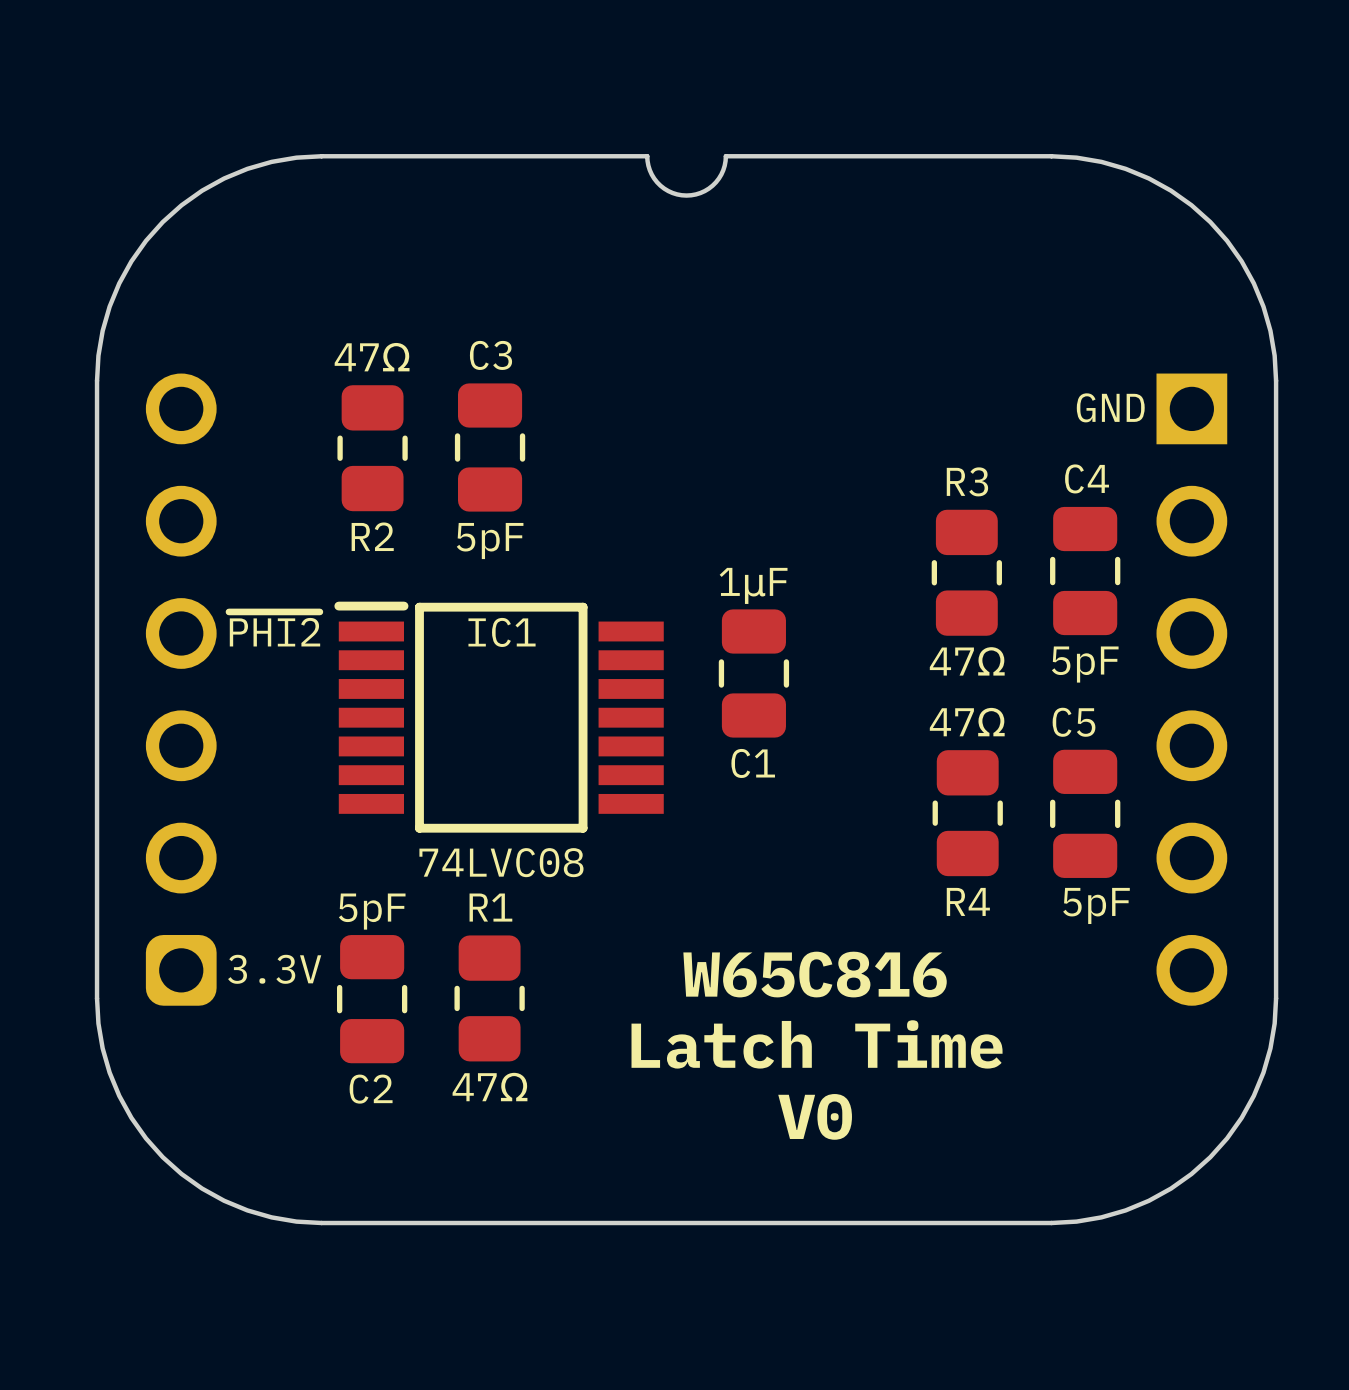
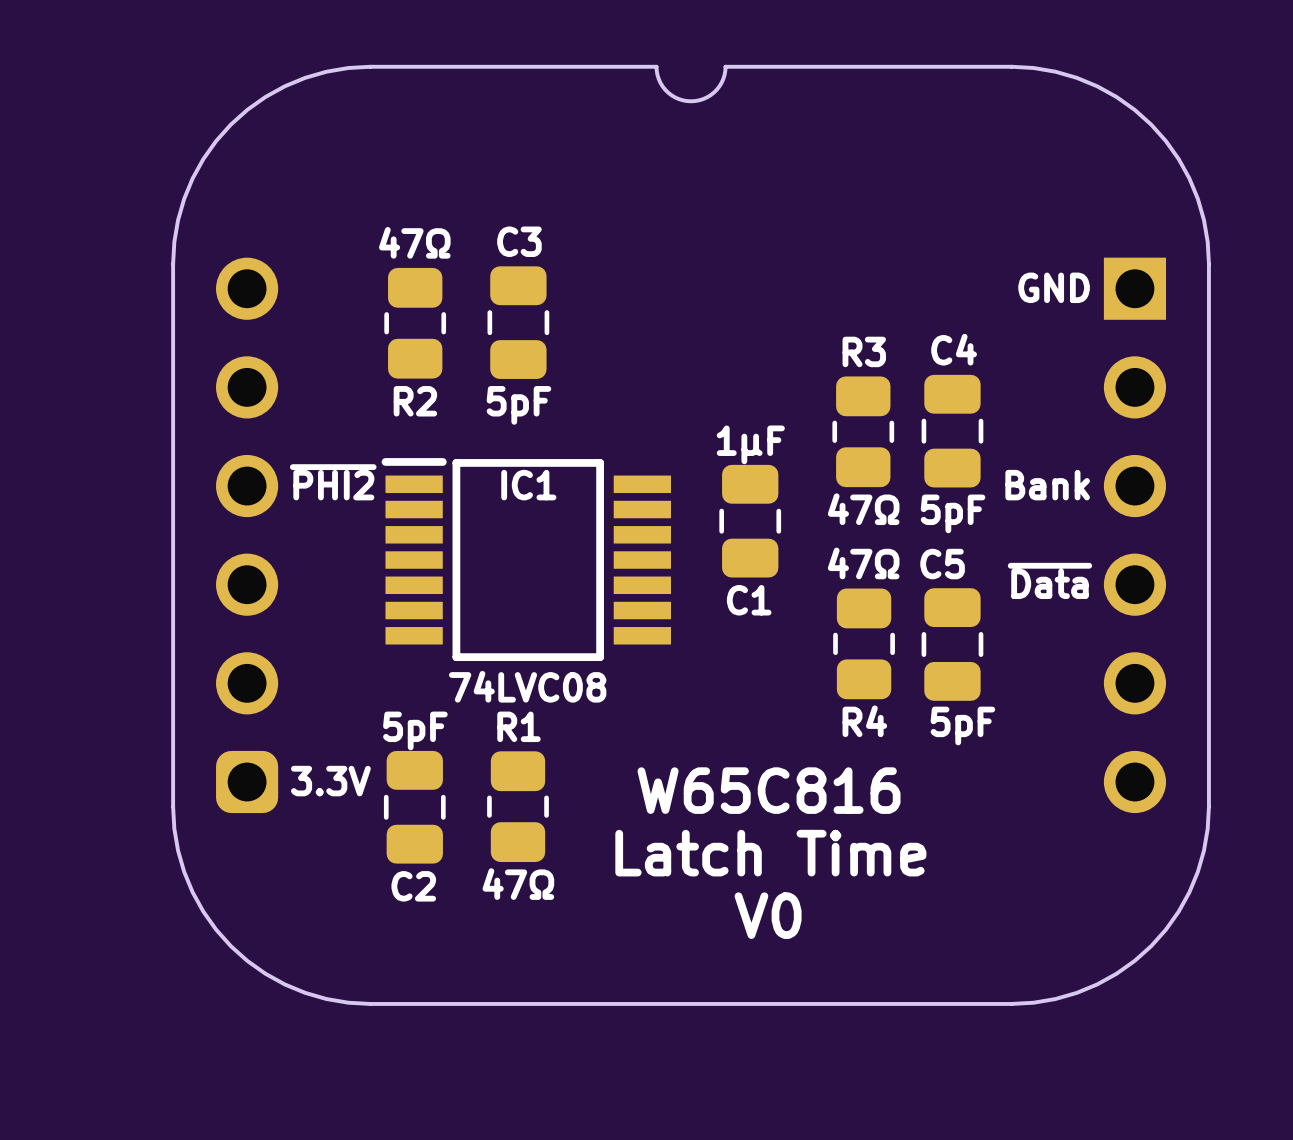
C4 position: (1085, 571) -> (952, 431)
R3 position: (966, 572) -> (863, 431)
text: none -> Bank (1047, 485)
text: none -> ~{Data} (1049, 580)
R4 position: (967, 813) -> (864, 643)
C5 position: (1085, 813) -> (952, 644)
text position: W65C816 (815, 974) -> W65C816 (769, 790)
text position: Latch Time (817, 1044) -> Latch Time (770, 853)
text position: V0 (815, 1116) -> V0 (768, 915)

